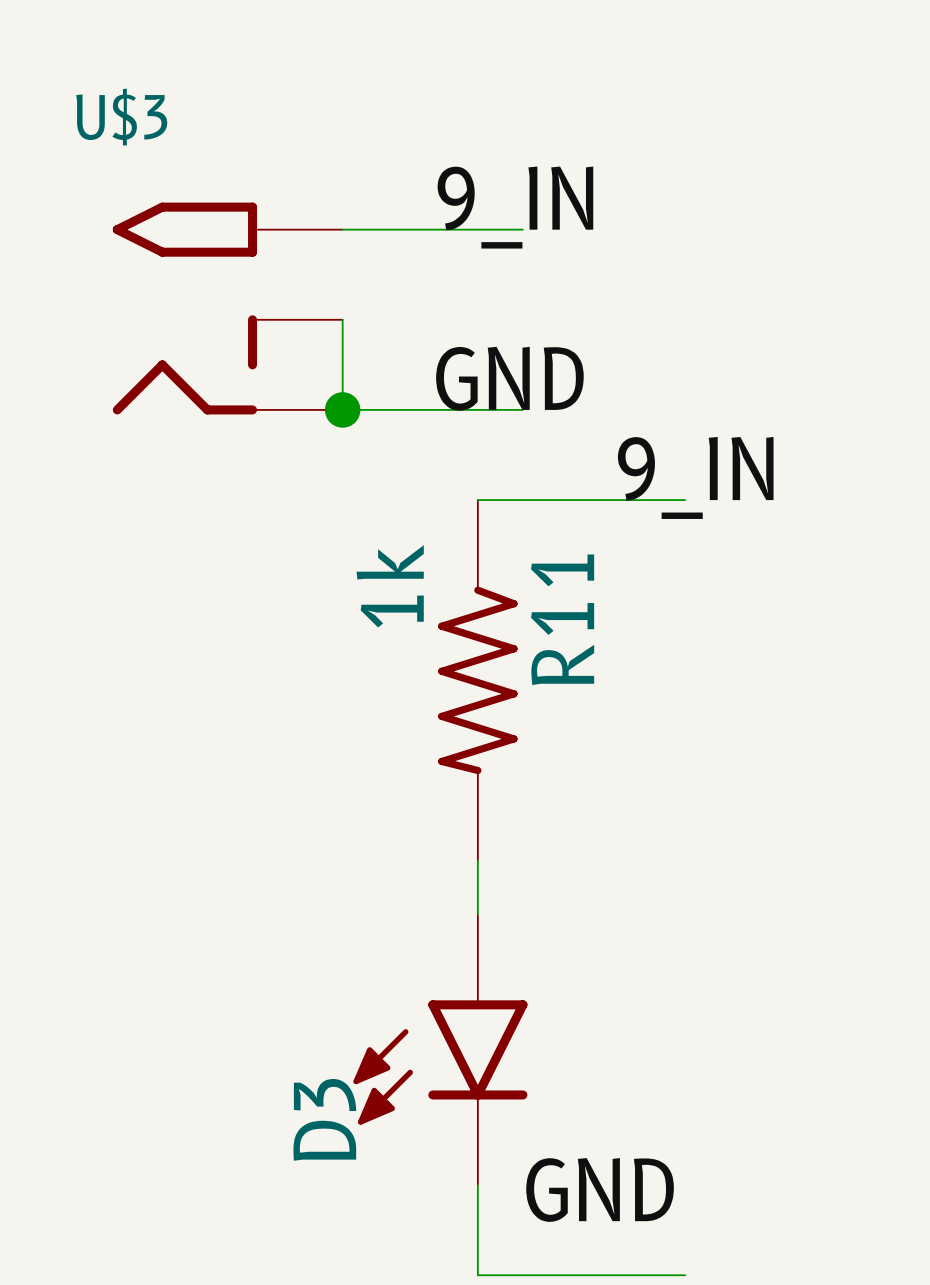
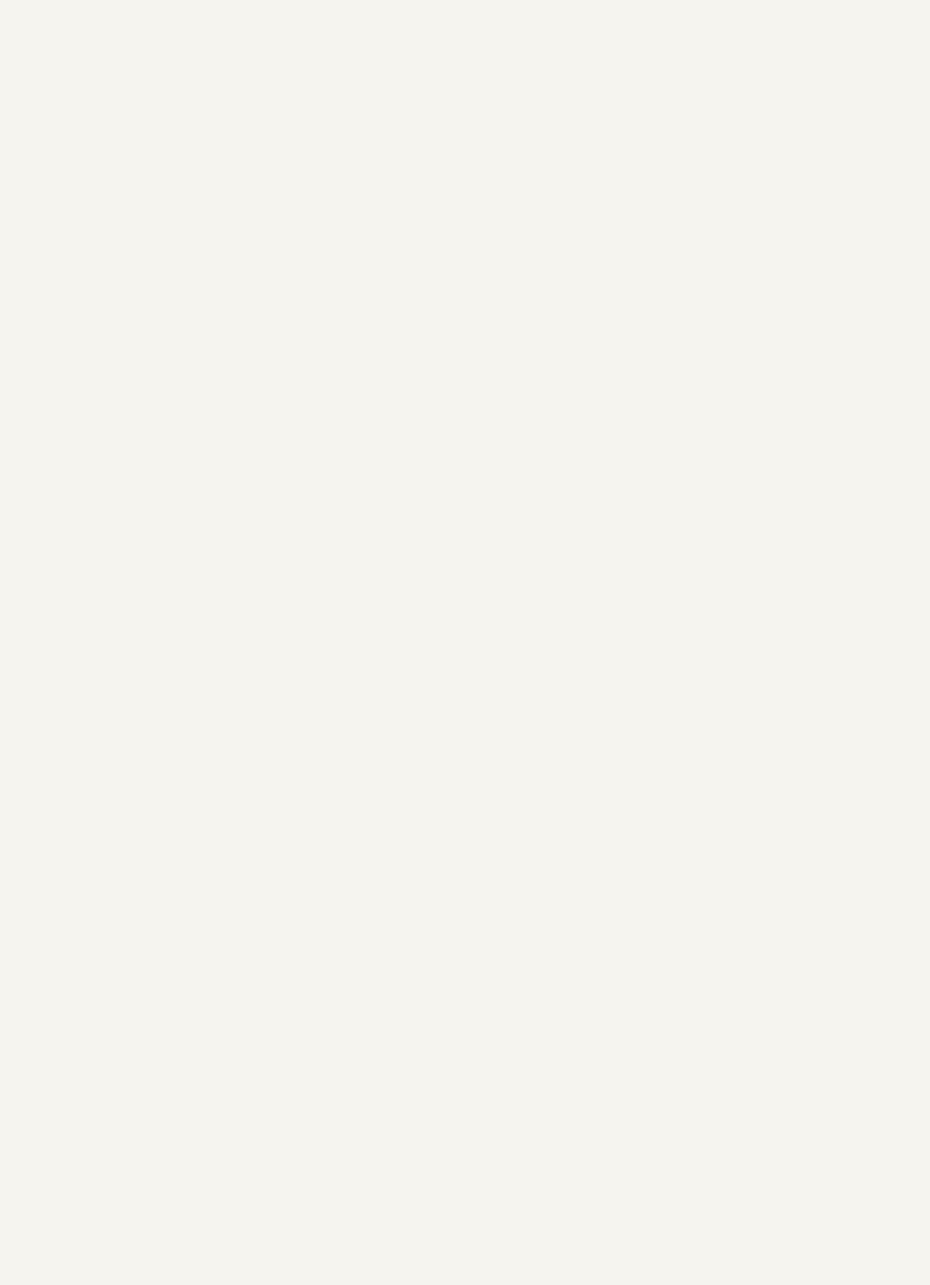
label: 9_IN (515, 207) -> none
wire: (342, 229) (522, 229) -> none
U$3: (227, 308) -> none
wire: (342, 319) (342, 409) (522, 409) -> none
label: GND (509, 378) -> none
junction: (342, 409) -> none
label: 9_IN (695, 477) -> none
wire: (477, 500) (685, 500) -> none
R11: 1k (477, 680) -> none
wire: (477, 860) (477, 914) -> none
D3: (440, 1049) -> none
wire: (477, 1185) (477, 1275) (685, 1275) -> none
label: GND (600, 1189) -> none

